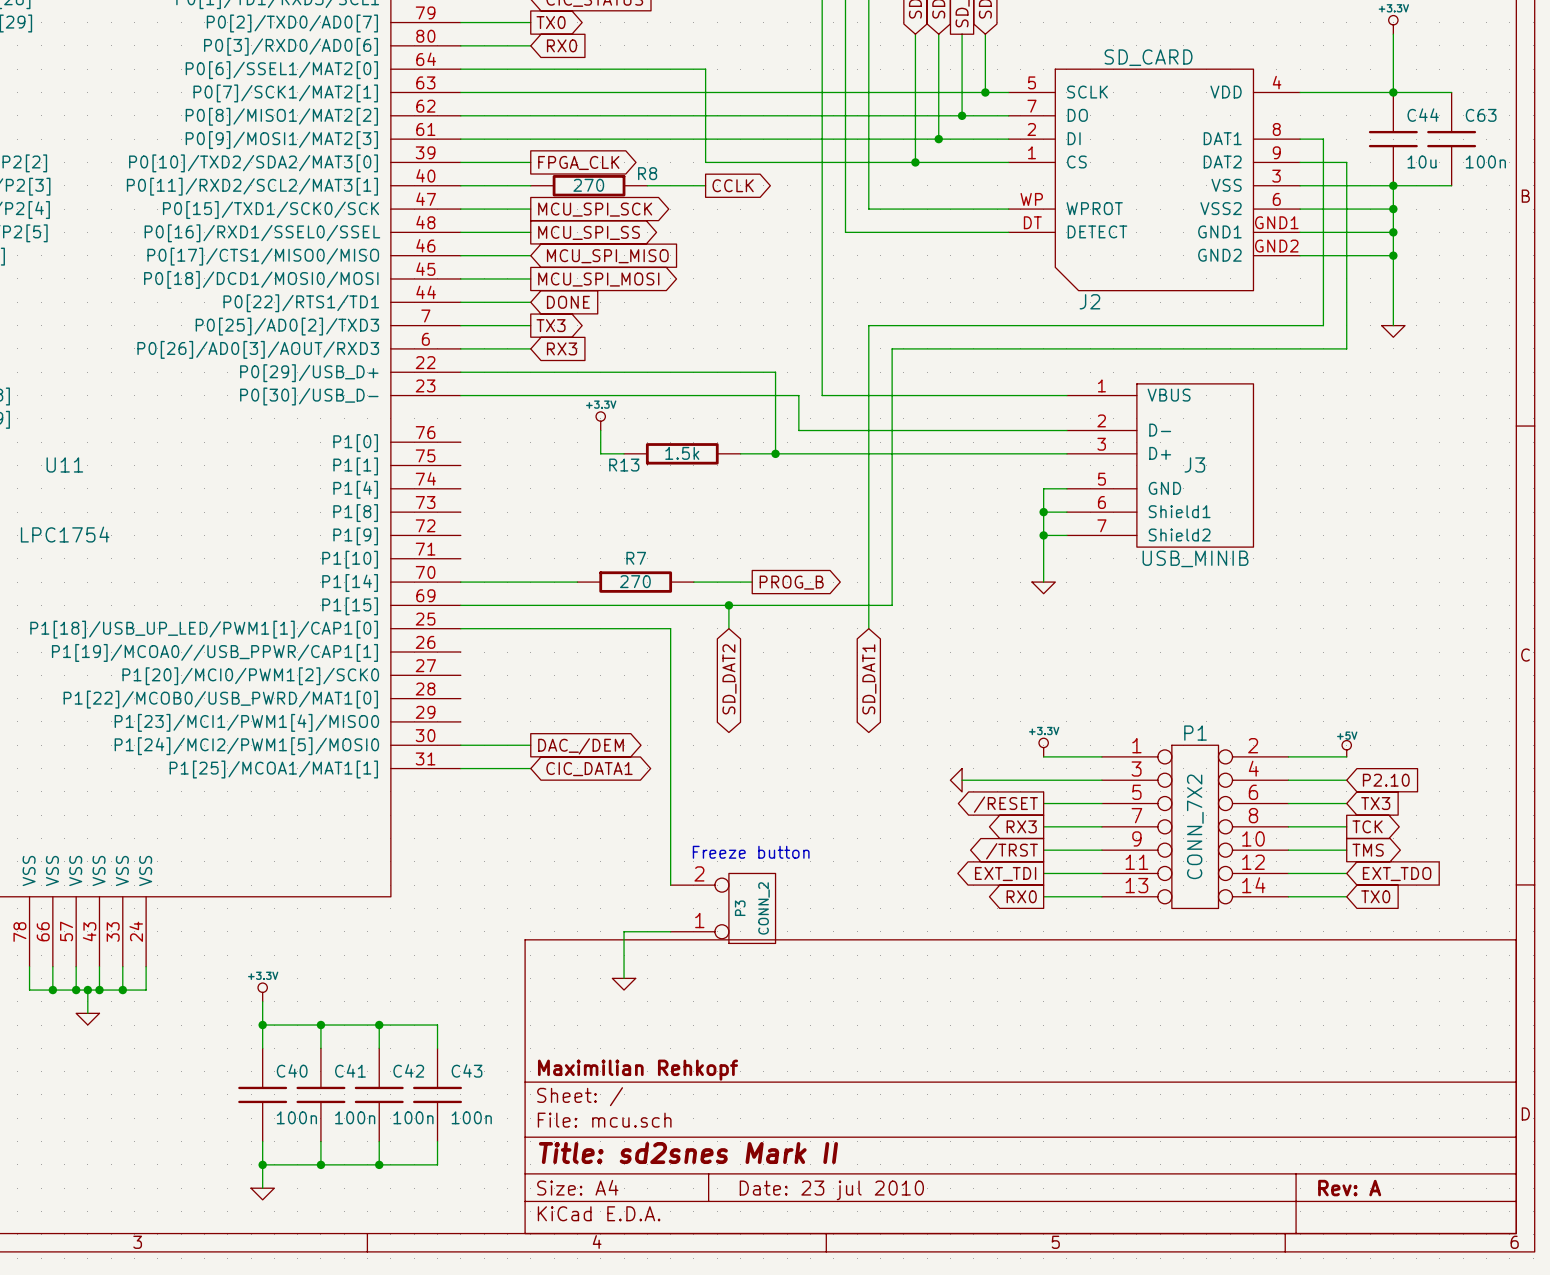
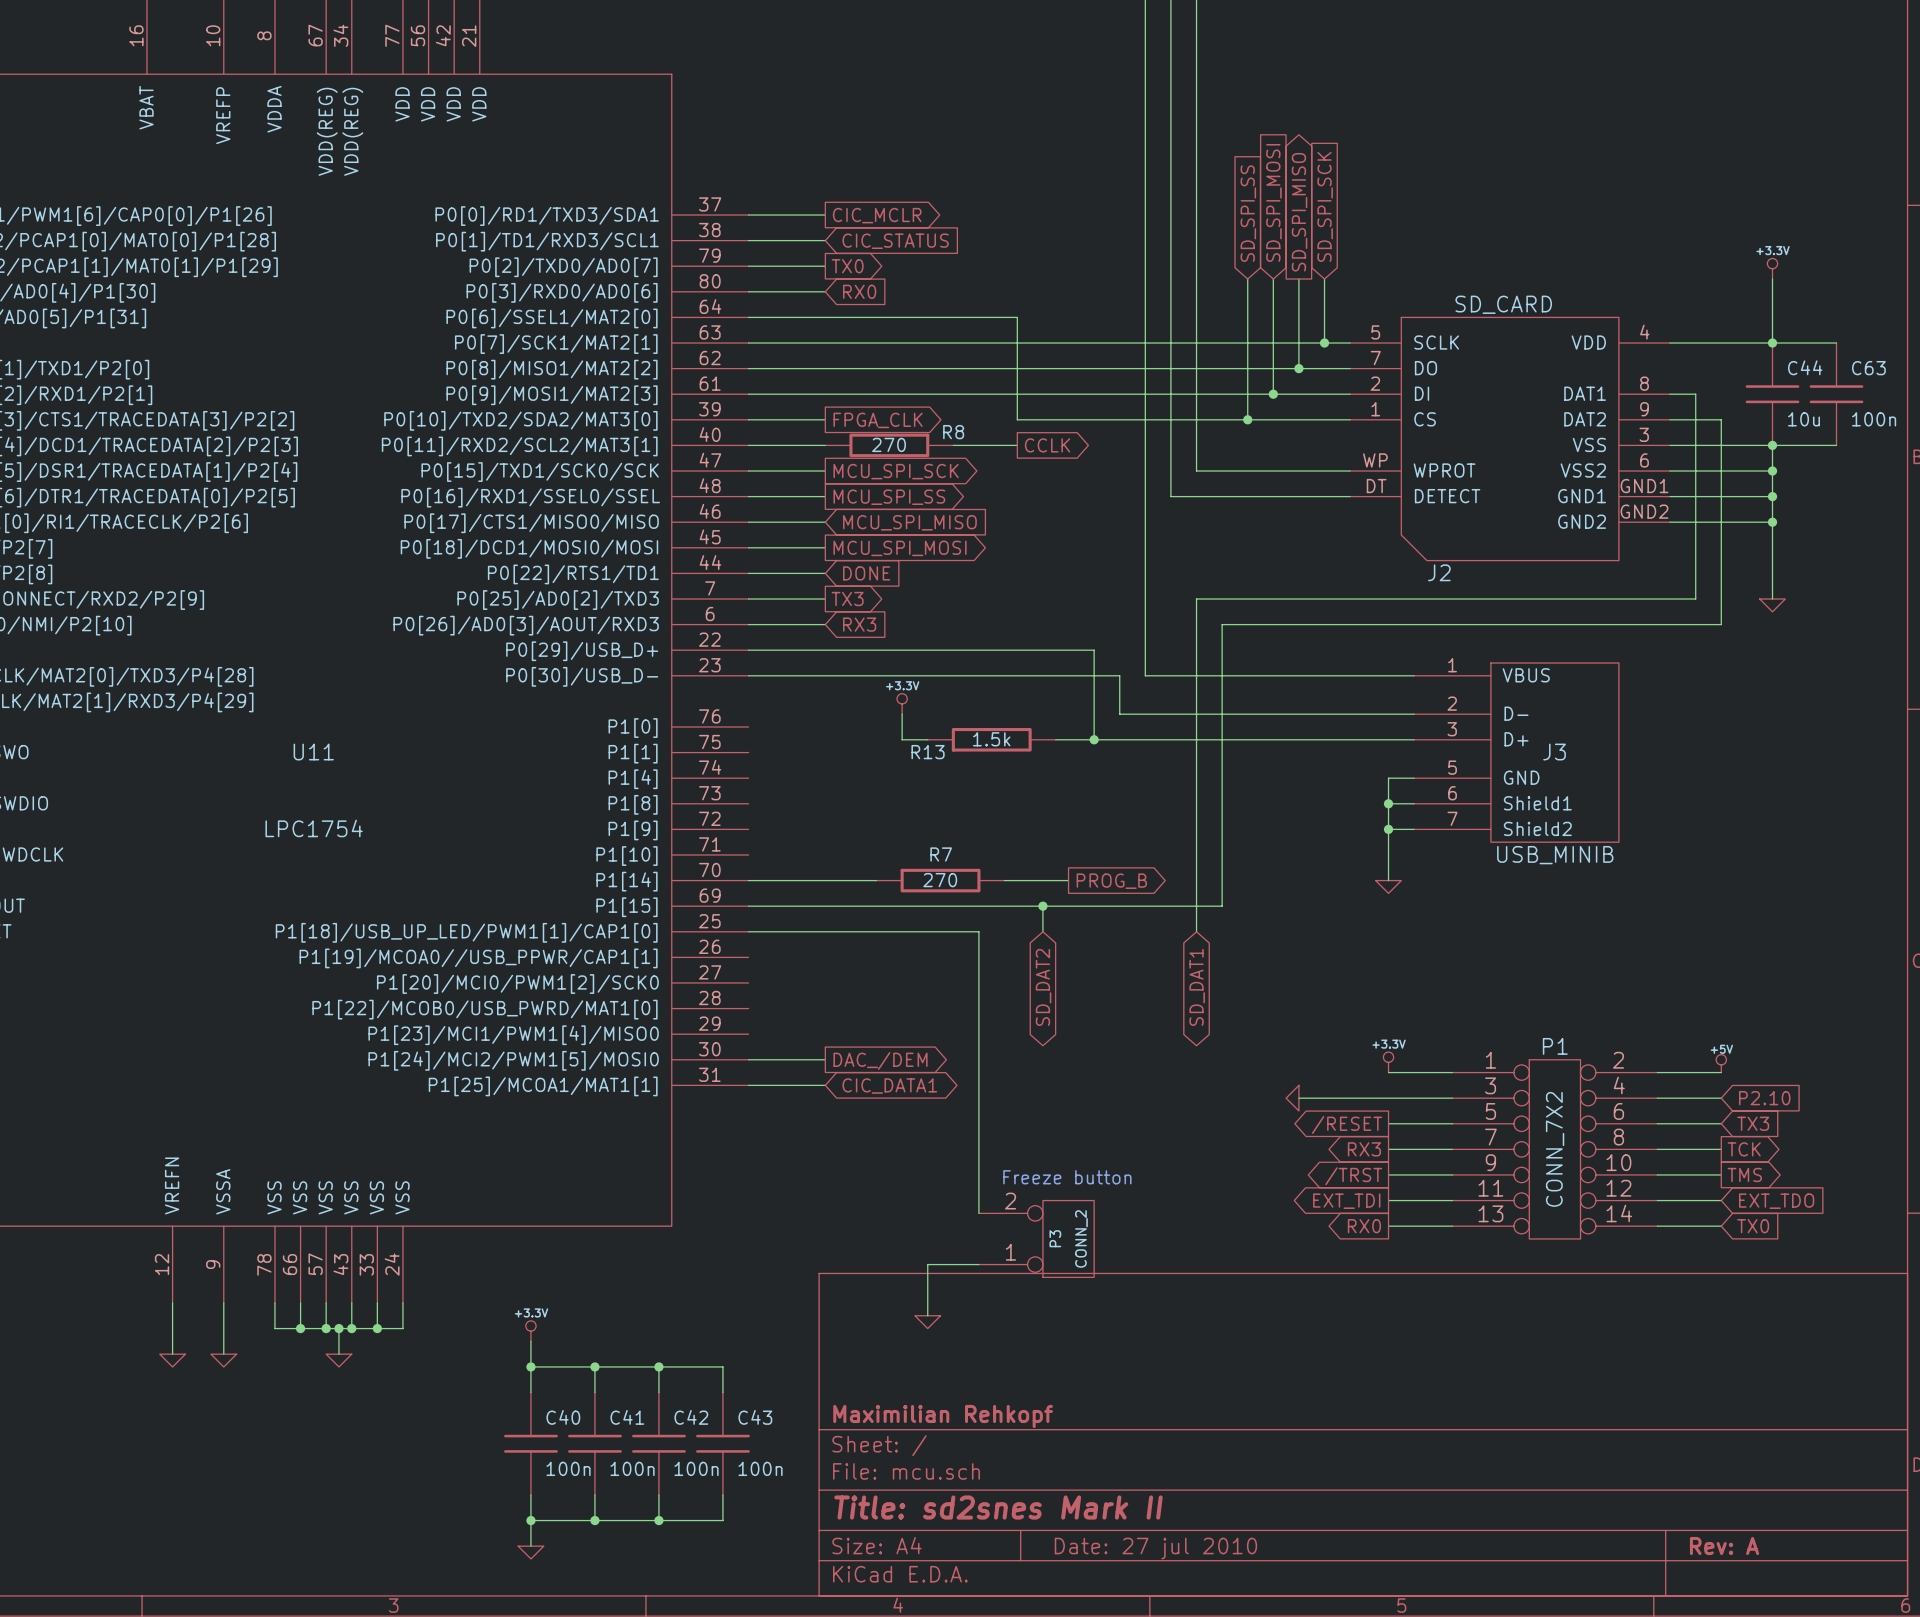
title block: Date: 23 jul 2010 (831, 1190) -> Date: 27 jul 2010 (1155, 1548)

